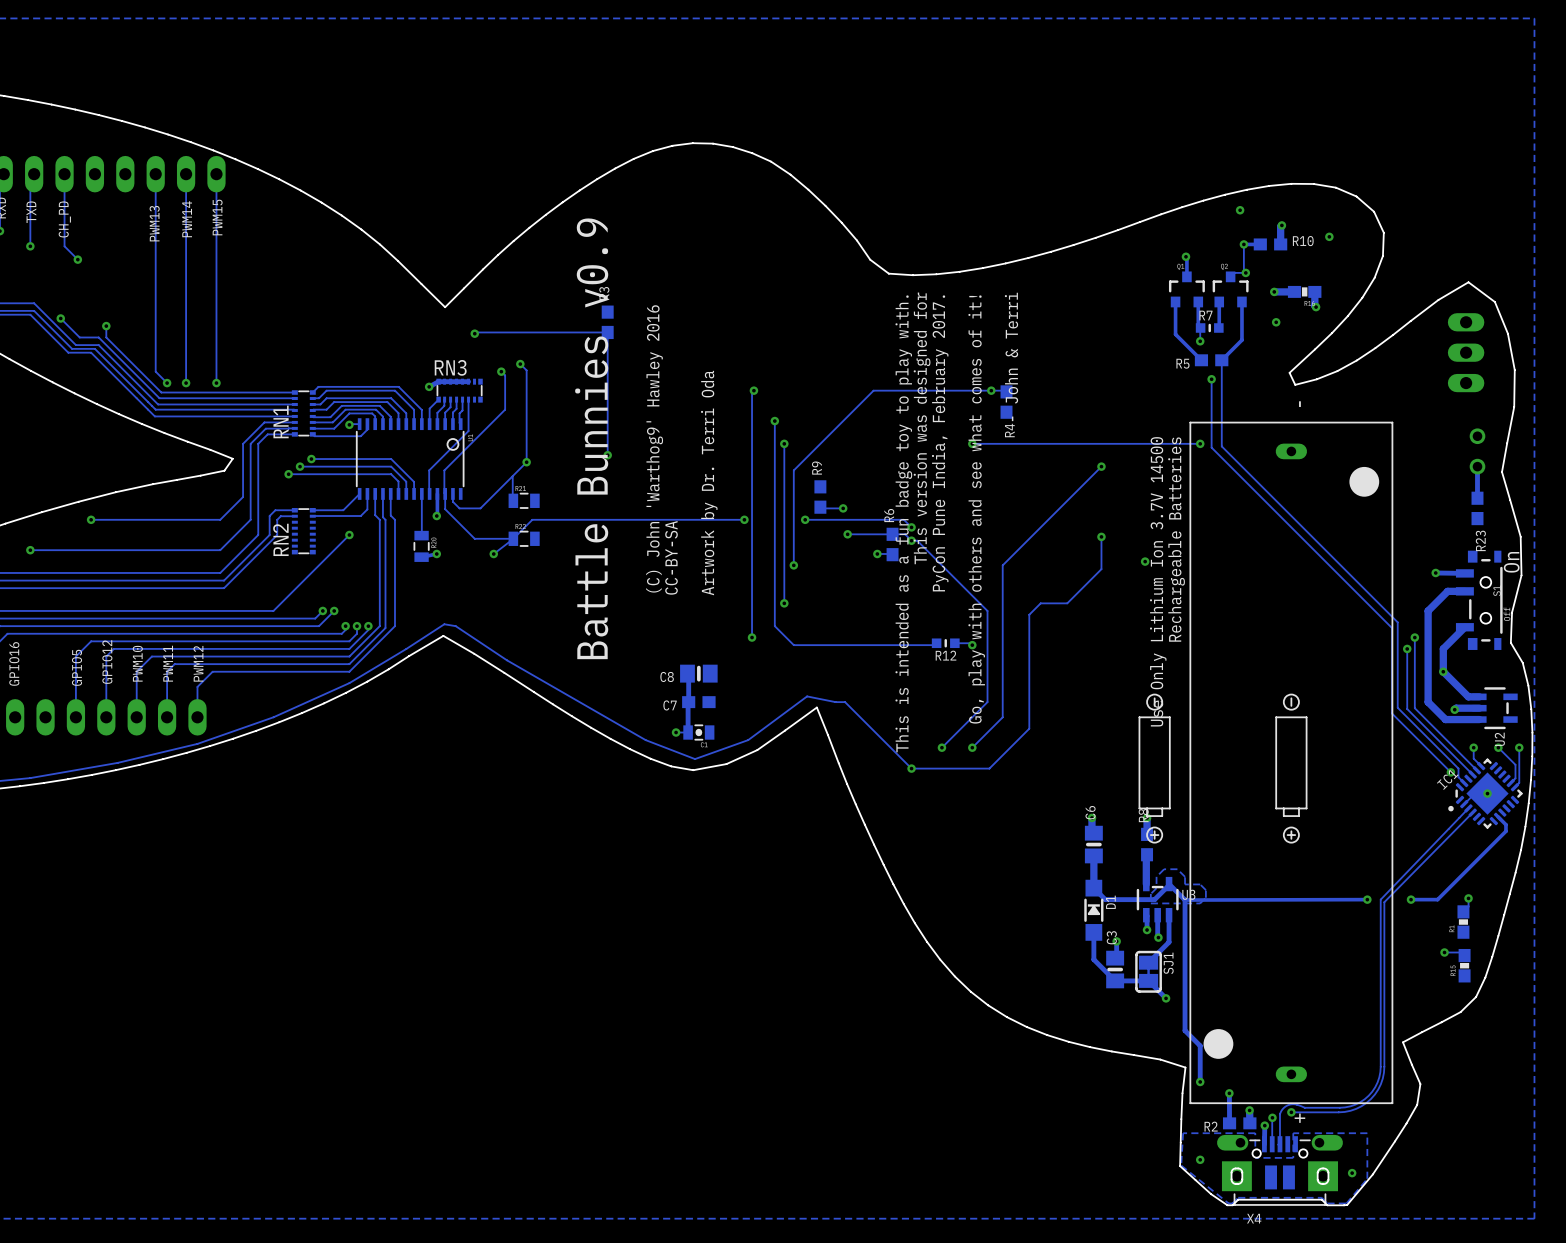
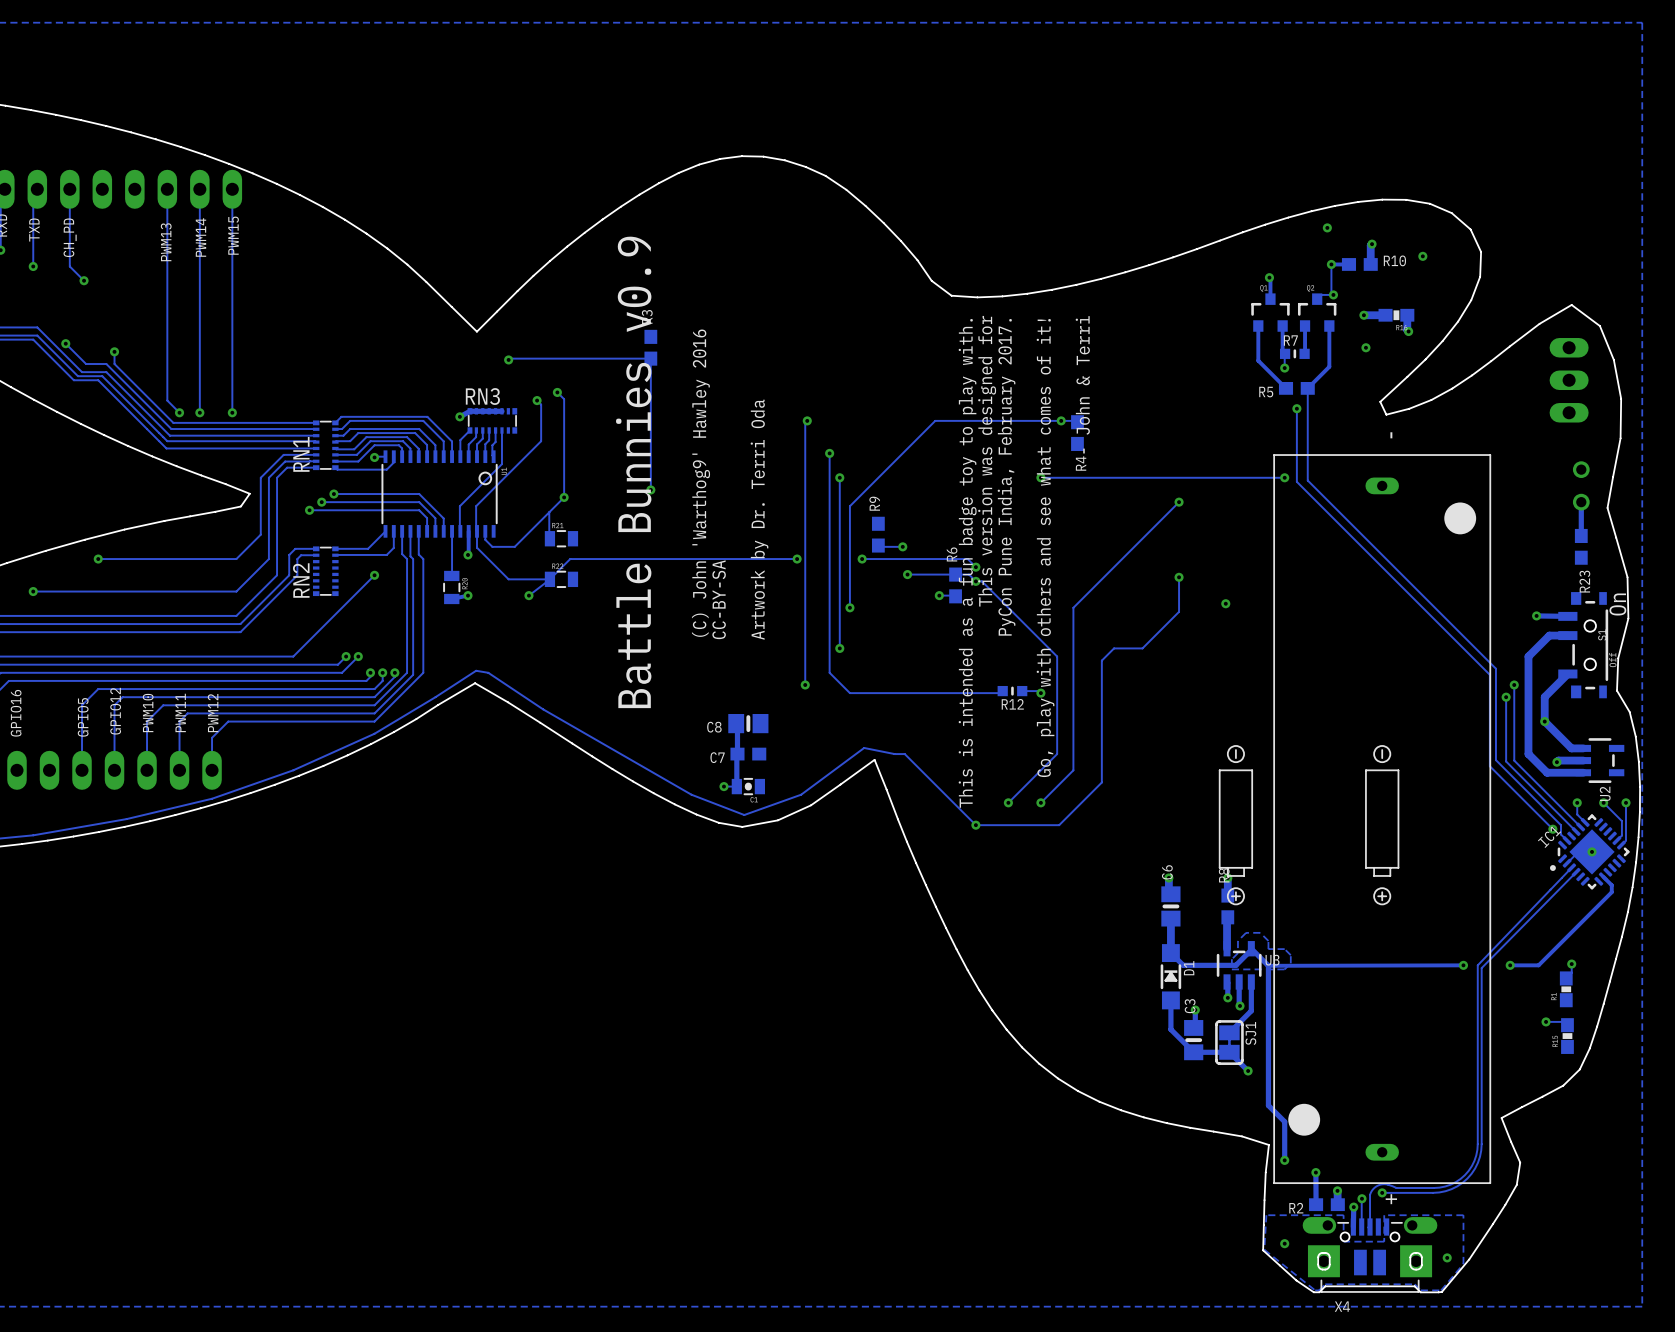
text: Rechargeable Batteries (1176, 539) -> none
text: Use Only Lithium Ion 3.7V 14500 (1158, 581) -> none

